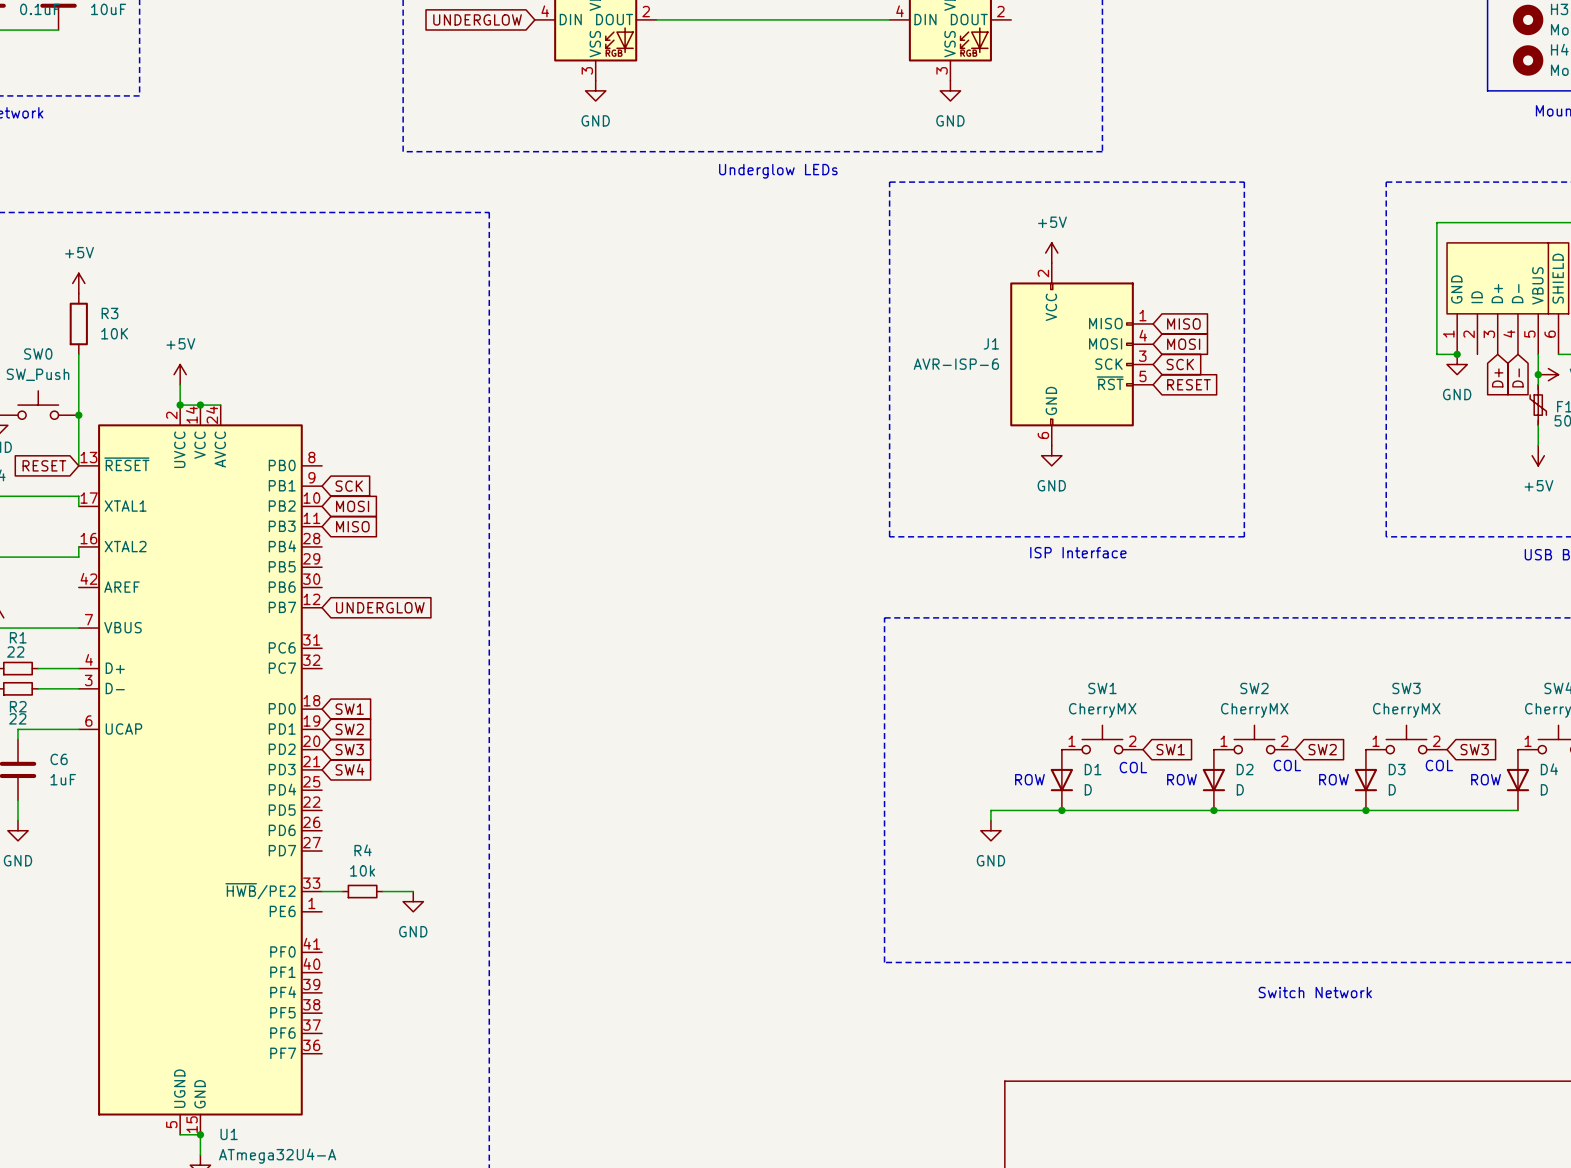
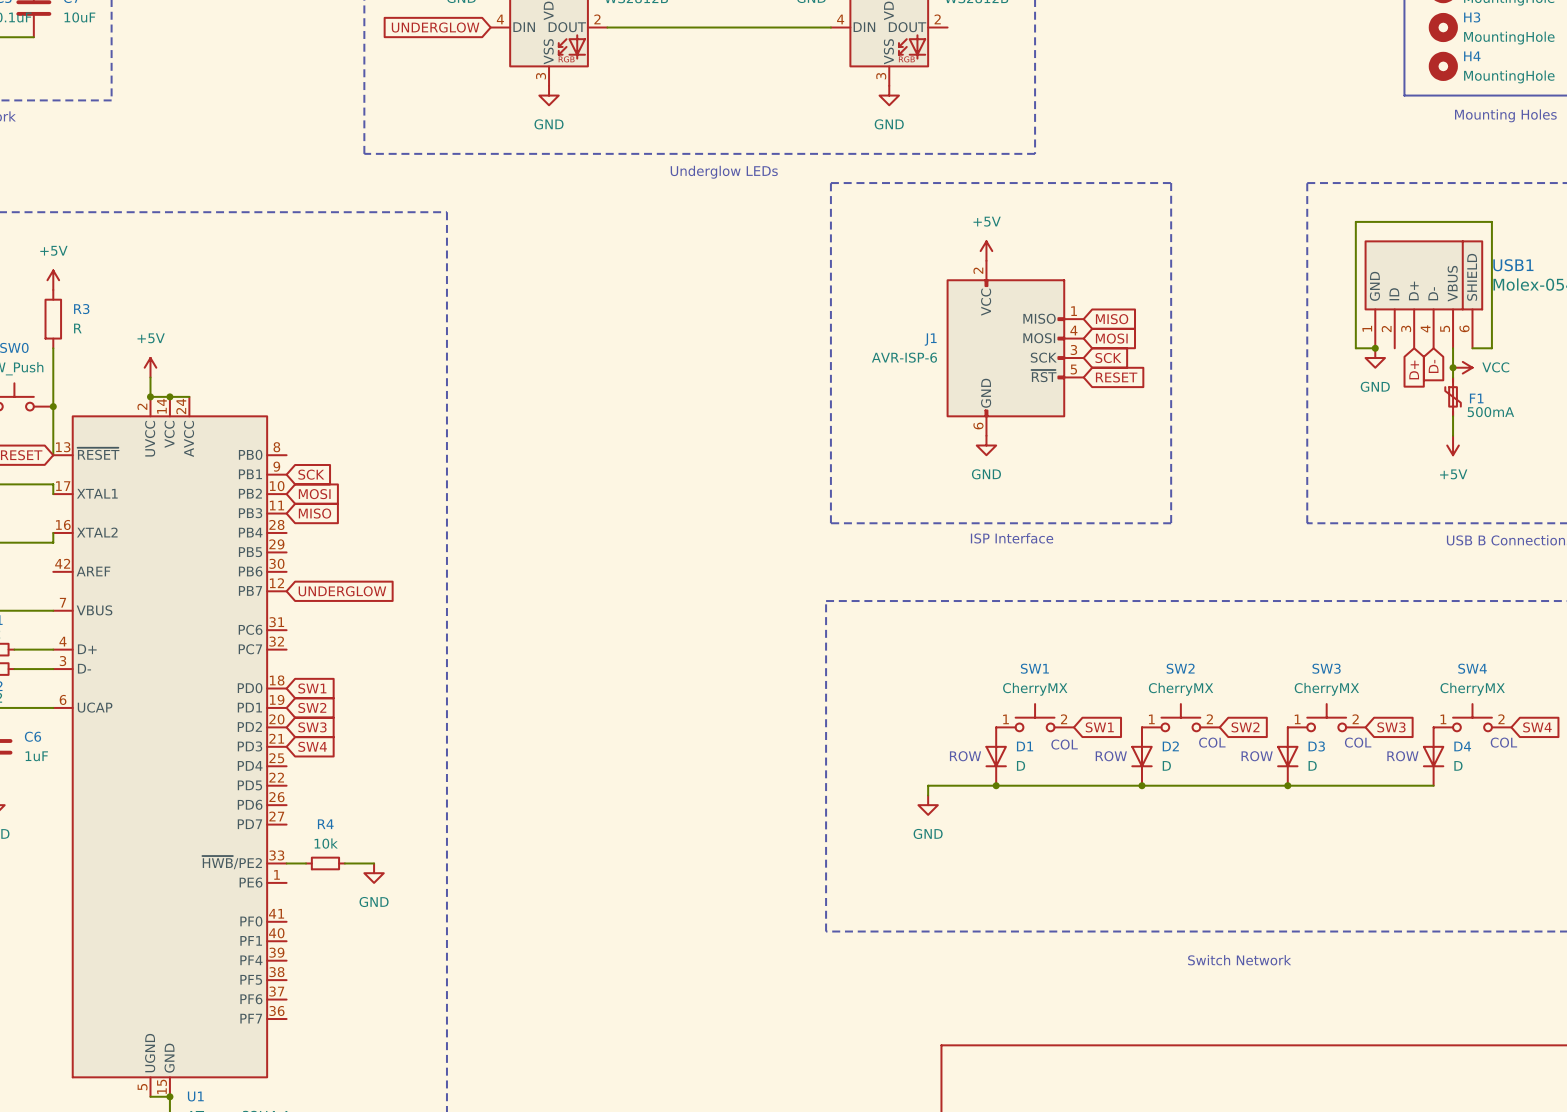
R3 value: 10K (114, 333) -> R (77, 328)

